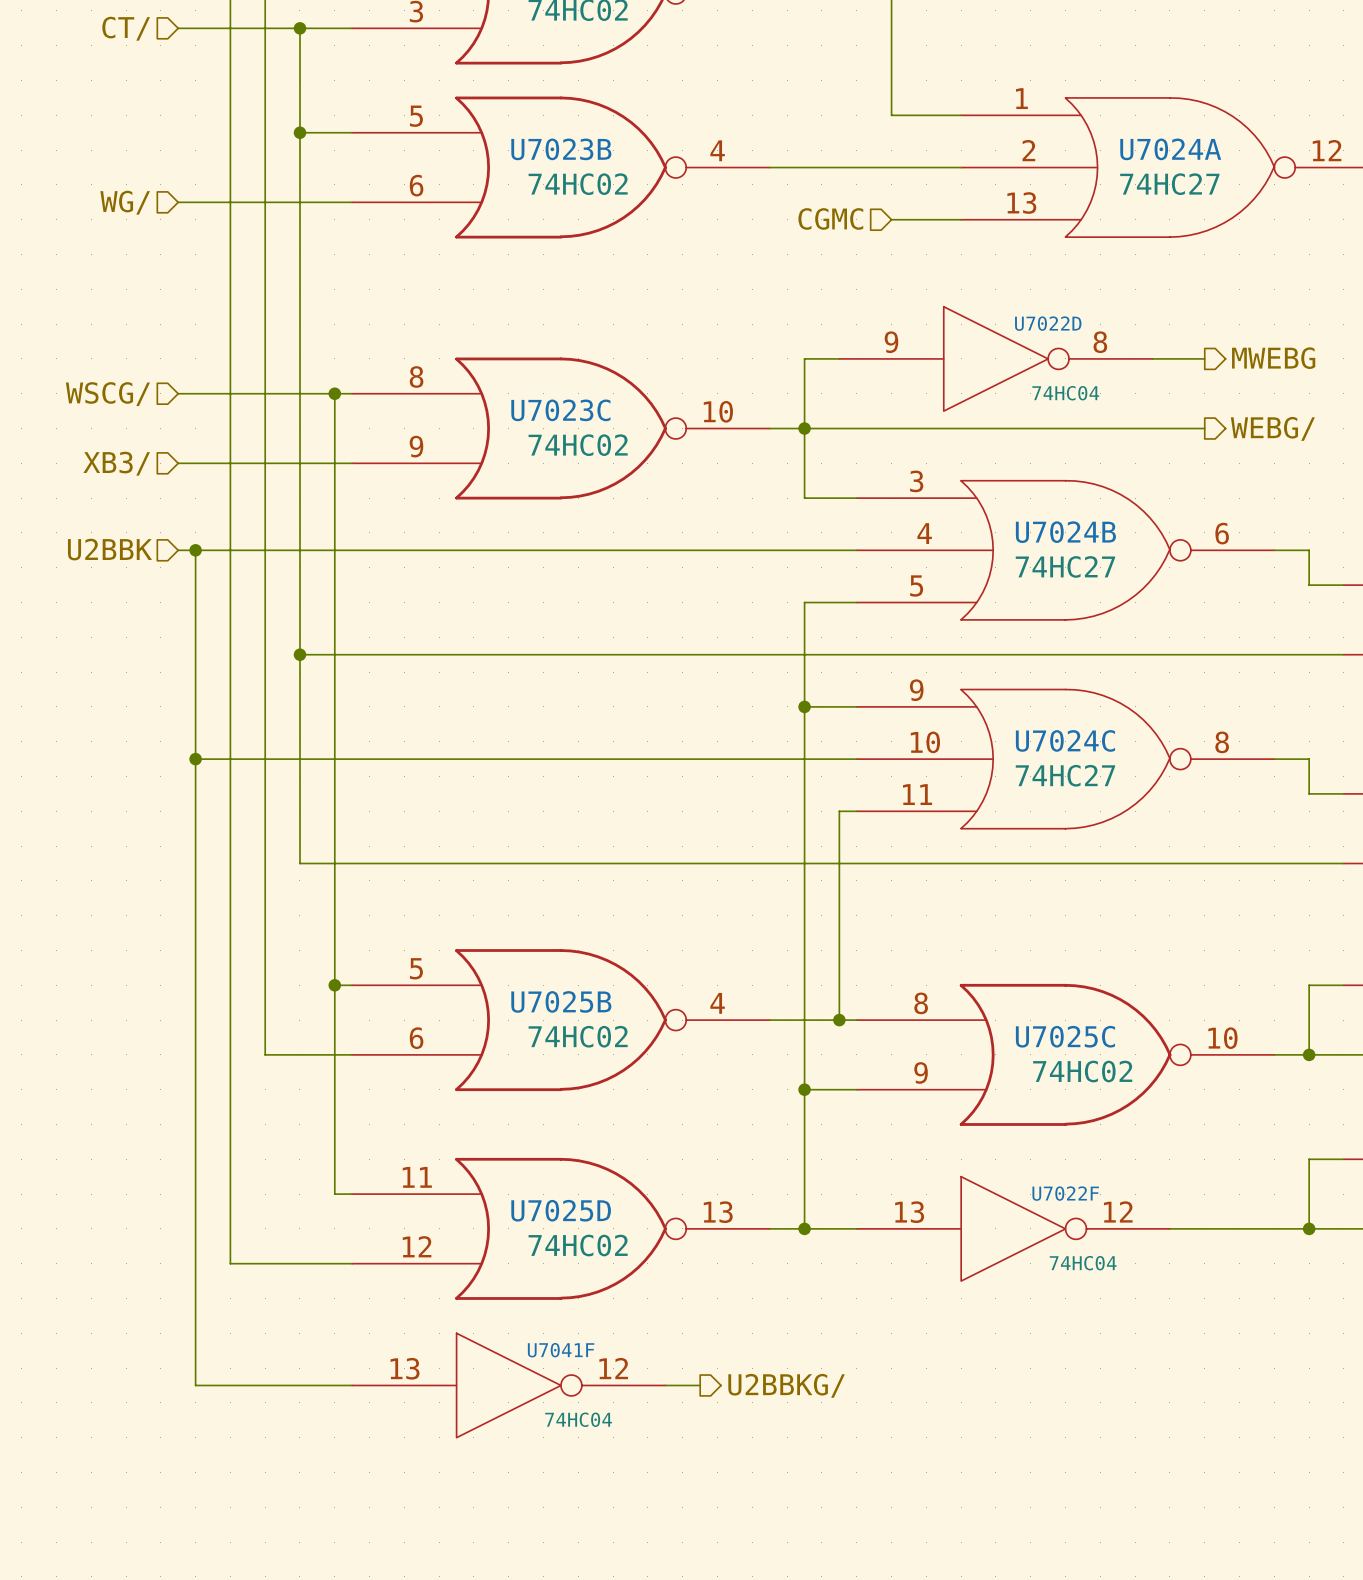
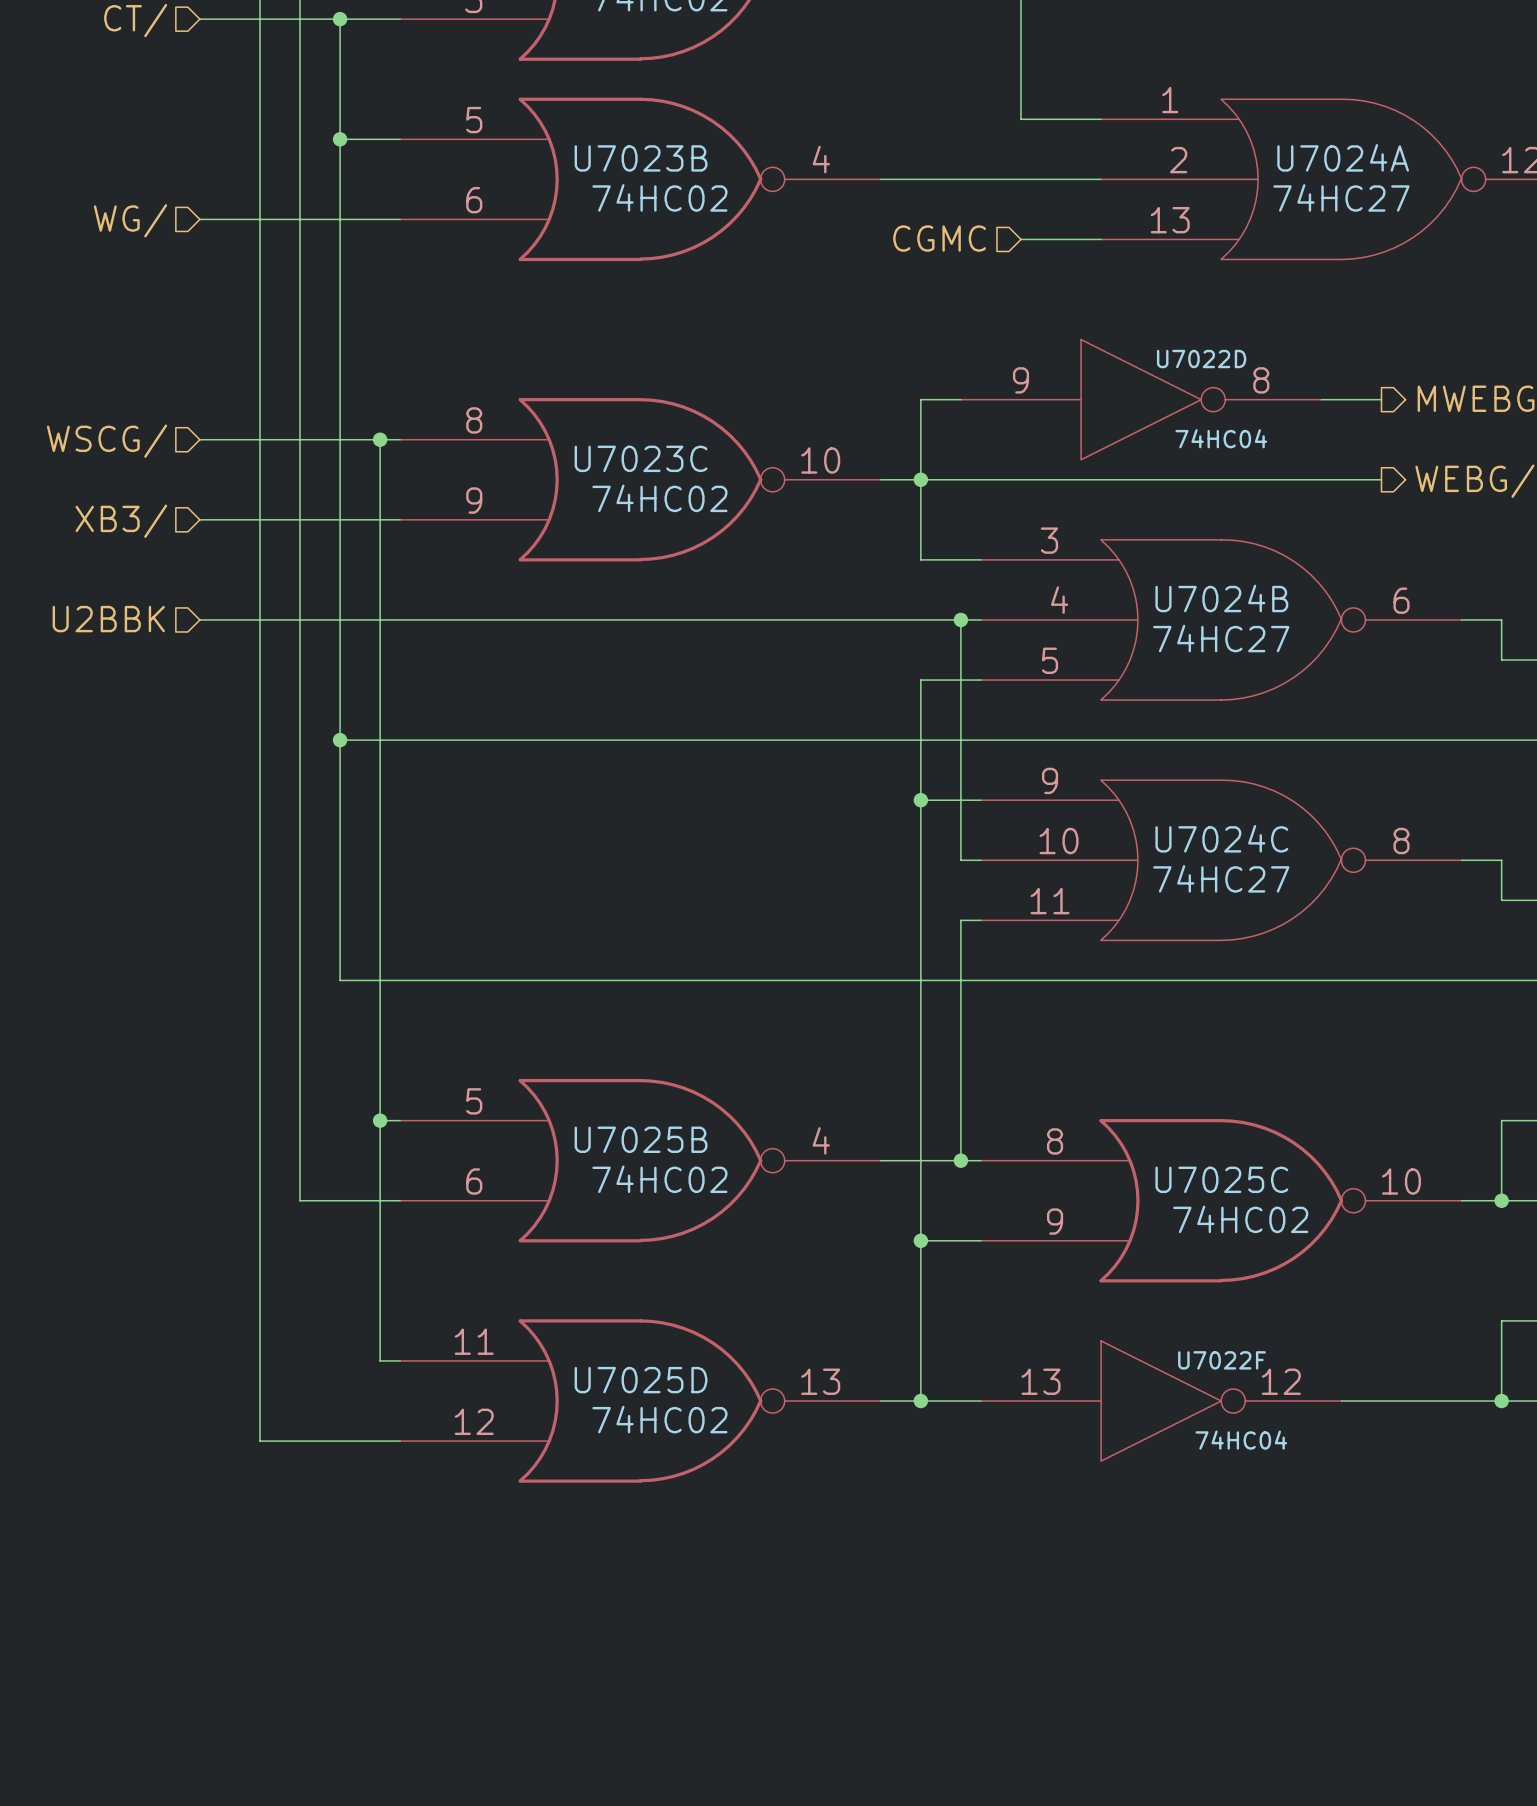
wire: (195, 550) (195, 1385) (352, 1385) -> none
junction: (195, 550) -> none
junction: none -> (960, 619)
wire: (195, 759) (839, 759) -> (960, 619) (960, 860)
junction: (195, 759) -> none
U7041F: 74HC04 (508, 1385) -> none
wire: (665, 1385) (700, 1385) -> none
hierarchical label: U2BBKG/ (786, 1385) -> none

